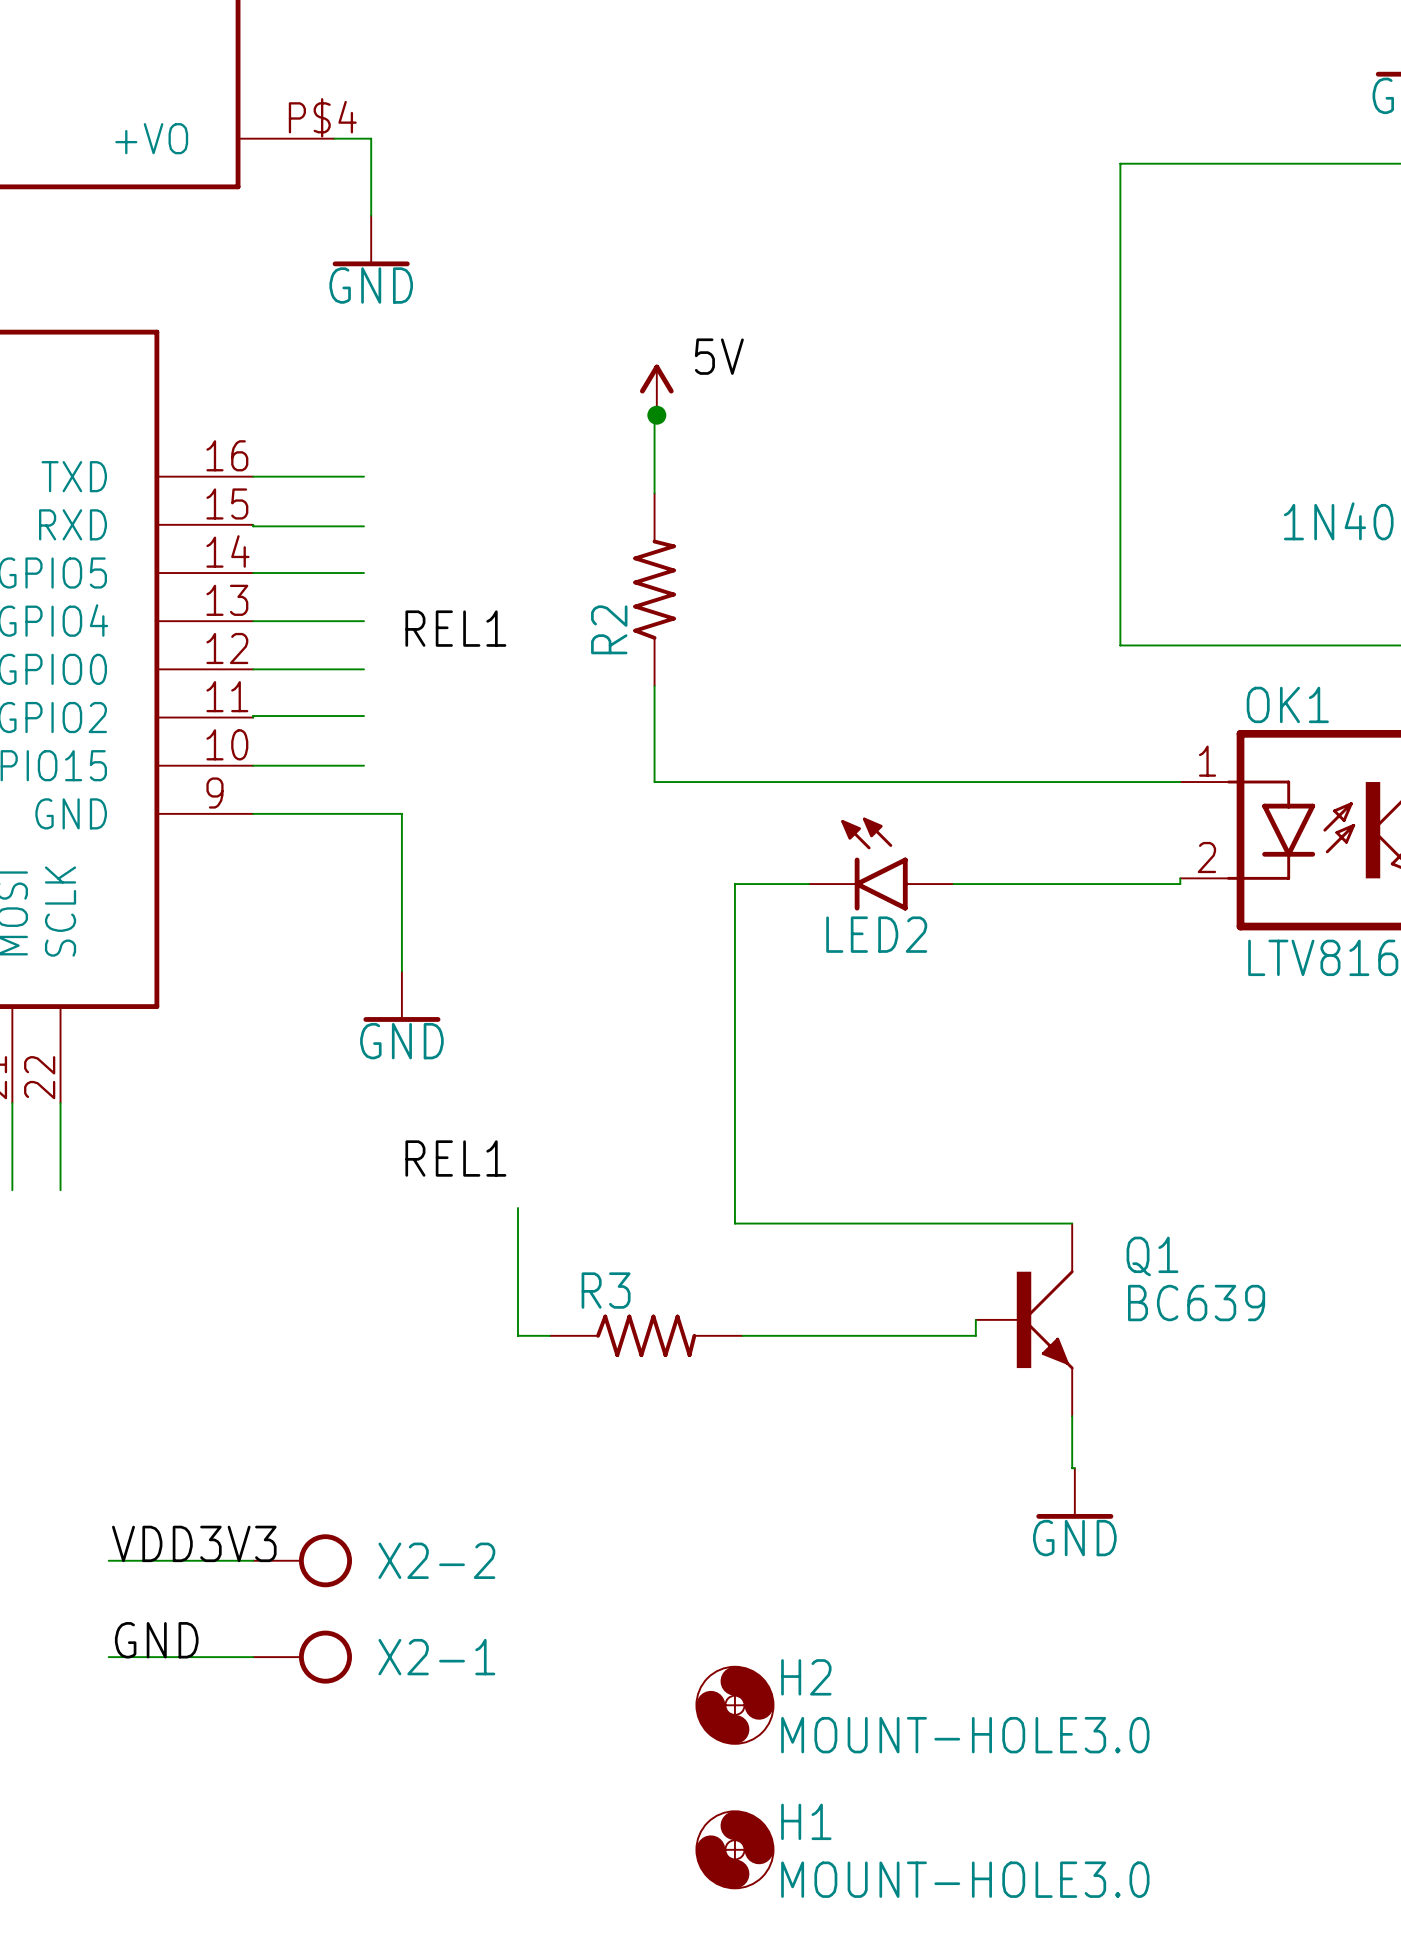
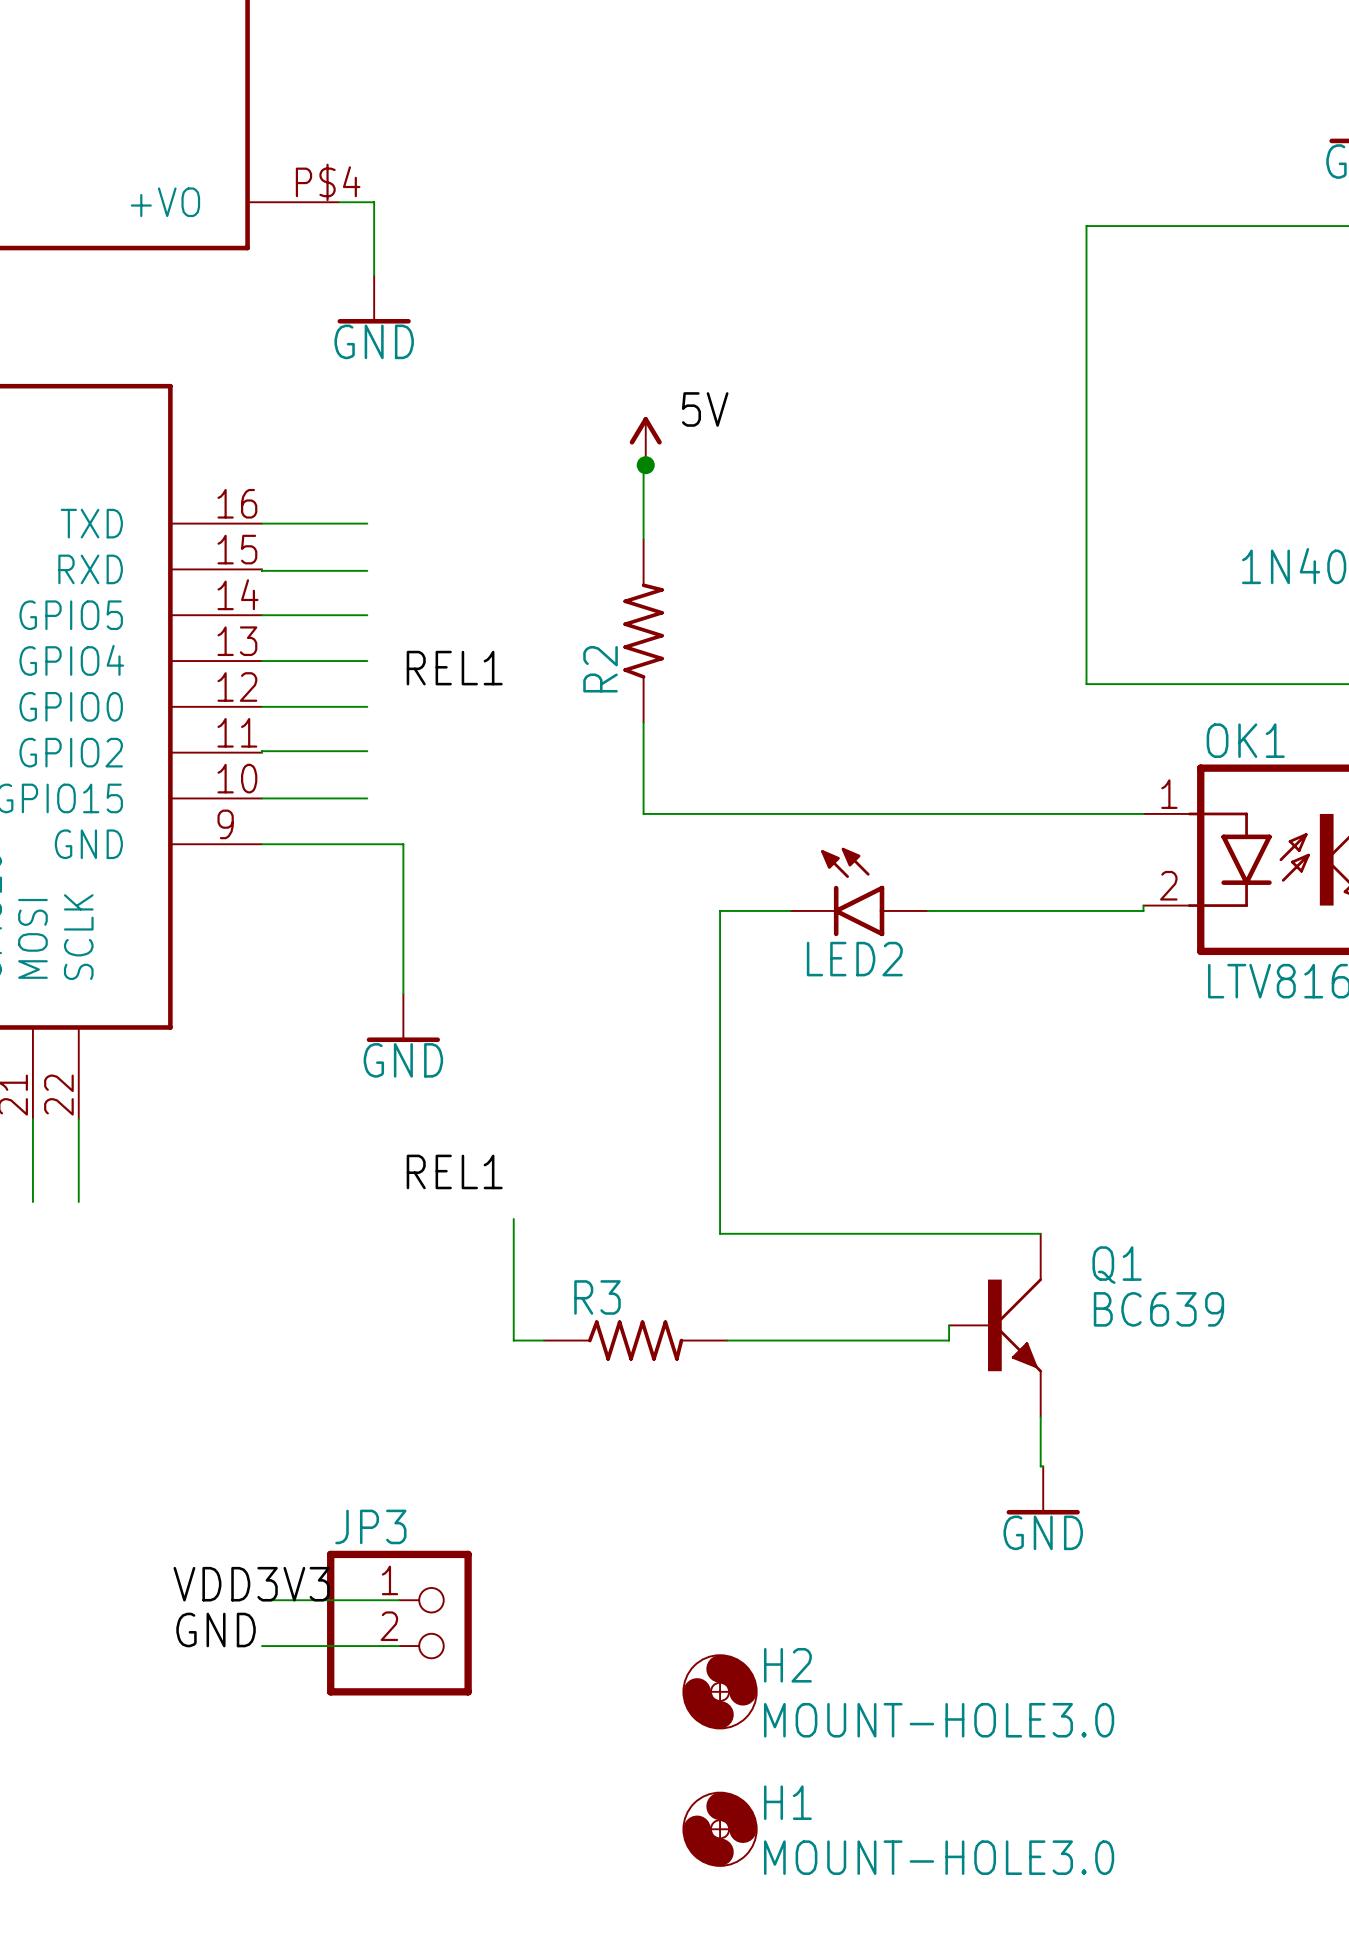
label position: VDD3V3 (194, 1543) -> VDD3V3 (251, 1584)
wire: (108, 1560) (253, 1560) -> (261, 1600) (399, 1600)
X2-2: (302, 1560) -> none
JP3: none -> (399, 1623)
label position: GND (156, 1640) -> GND (216, 1630)
wire: (108, 1657) (253, 1657) -> (399, 1646) (261, 1646)
X2-1: (302, 1657) -> none

